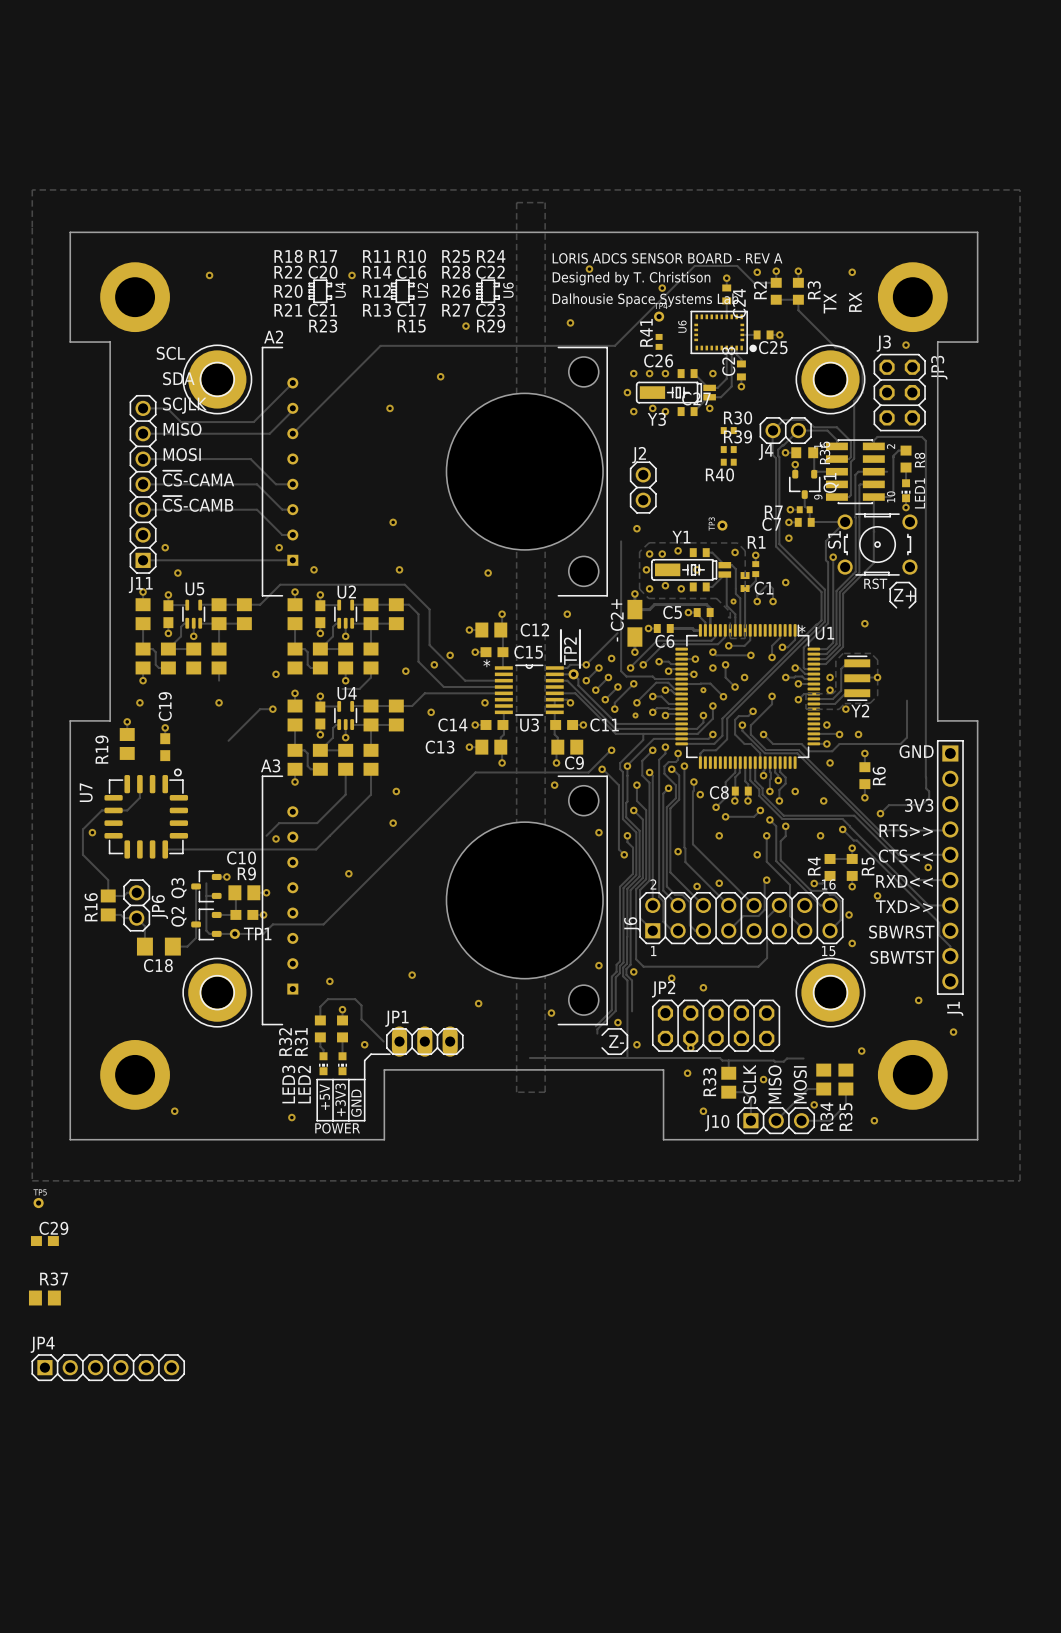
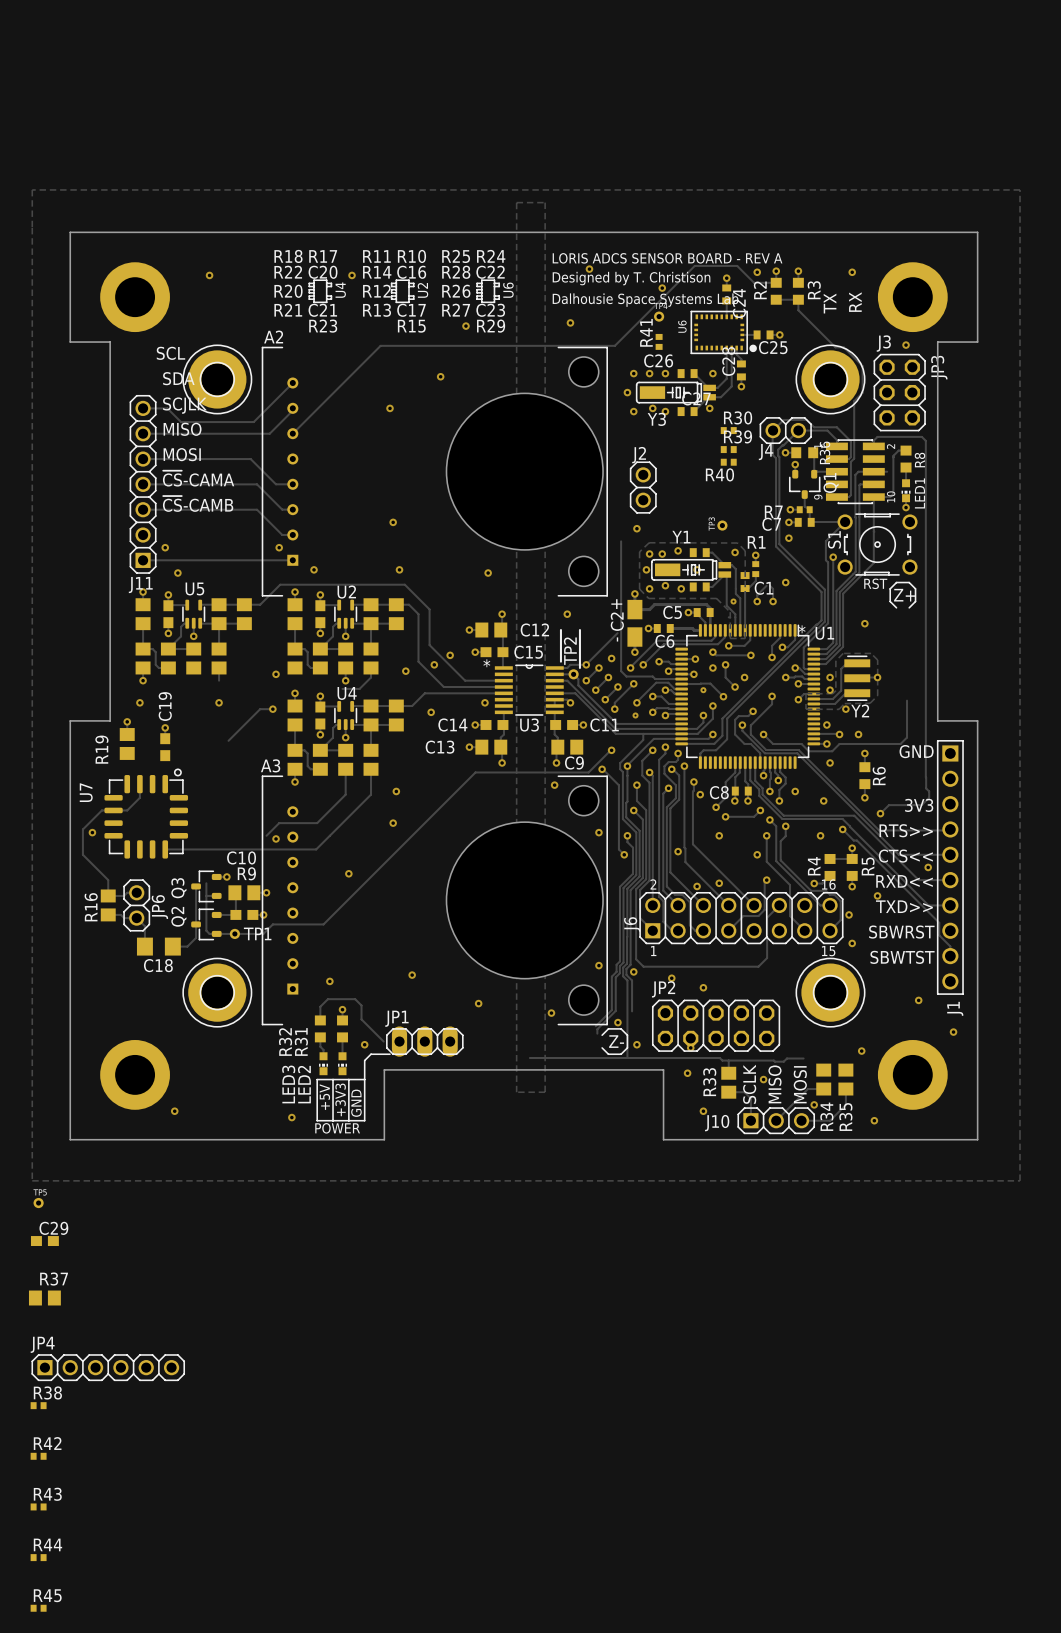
R38: none -> (38, 1405)
R42: none -> (38, 1456)
R43: none -> (38, 1506)
R44: none -> (38, 1557)
R45: none -> (38, 1608)

